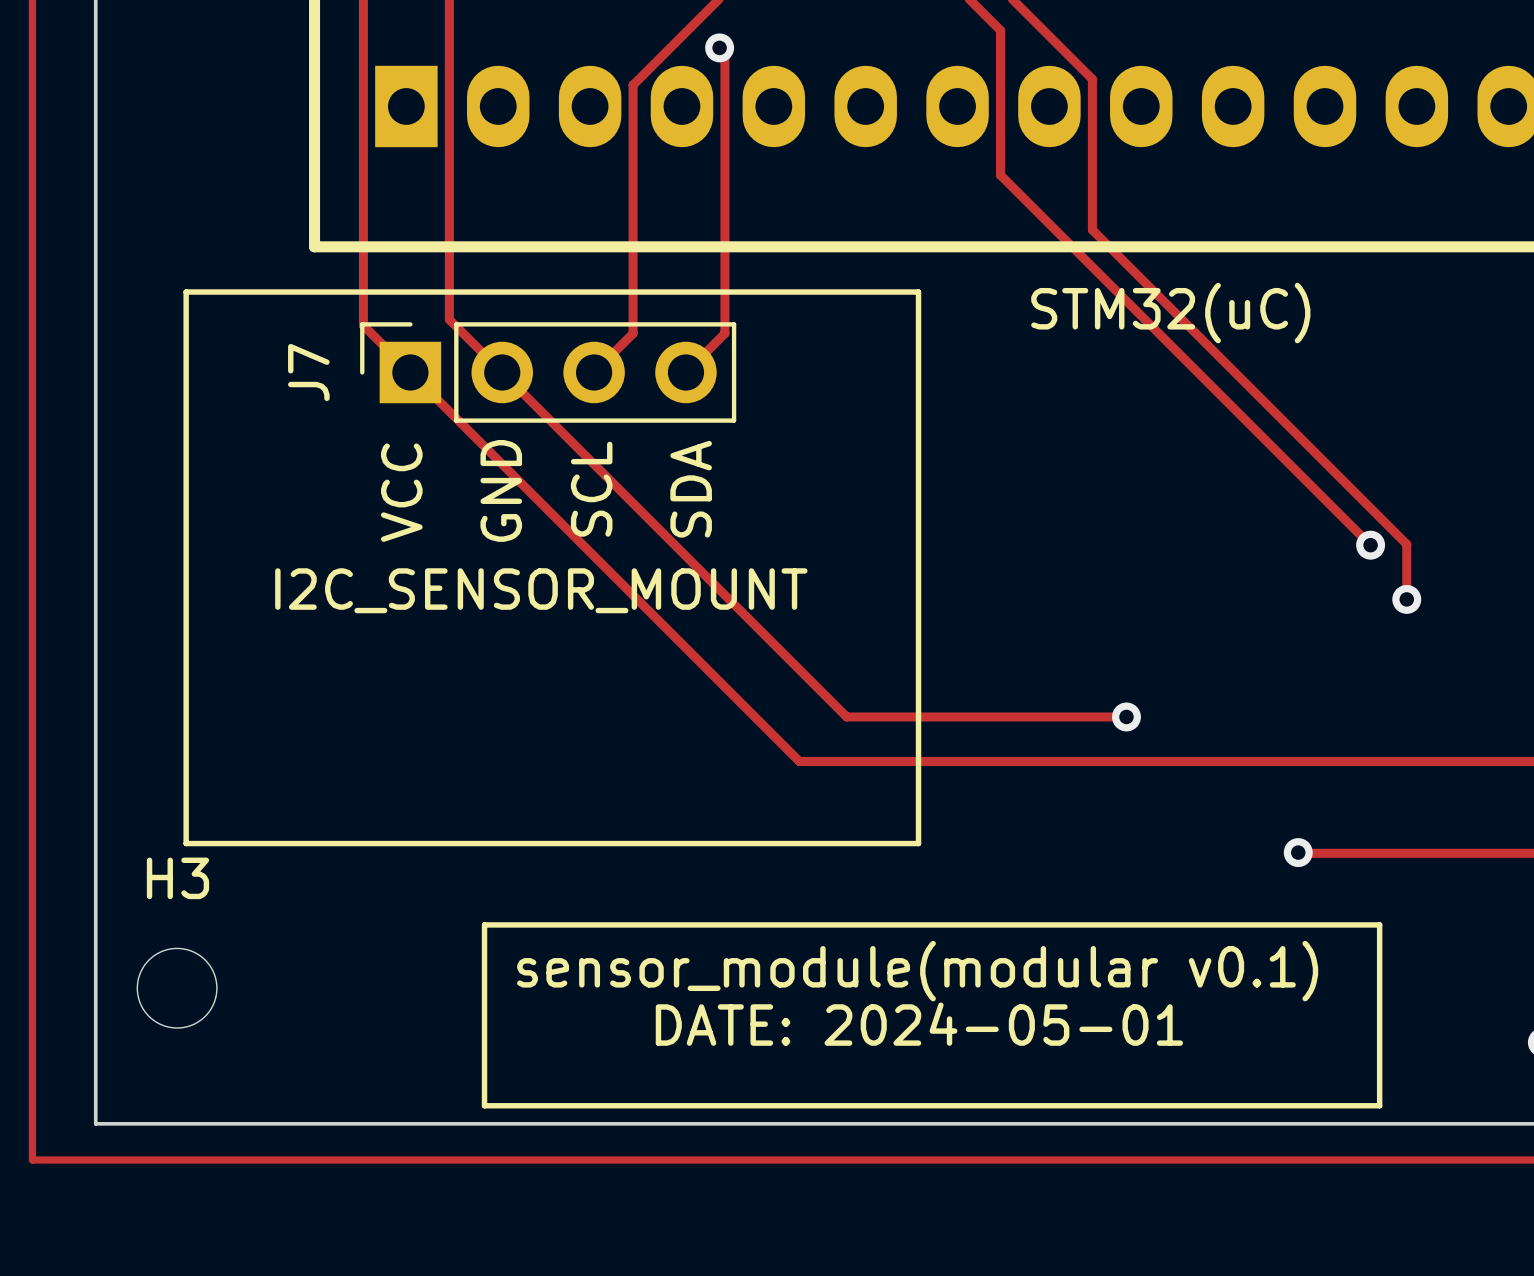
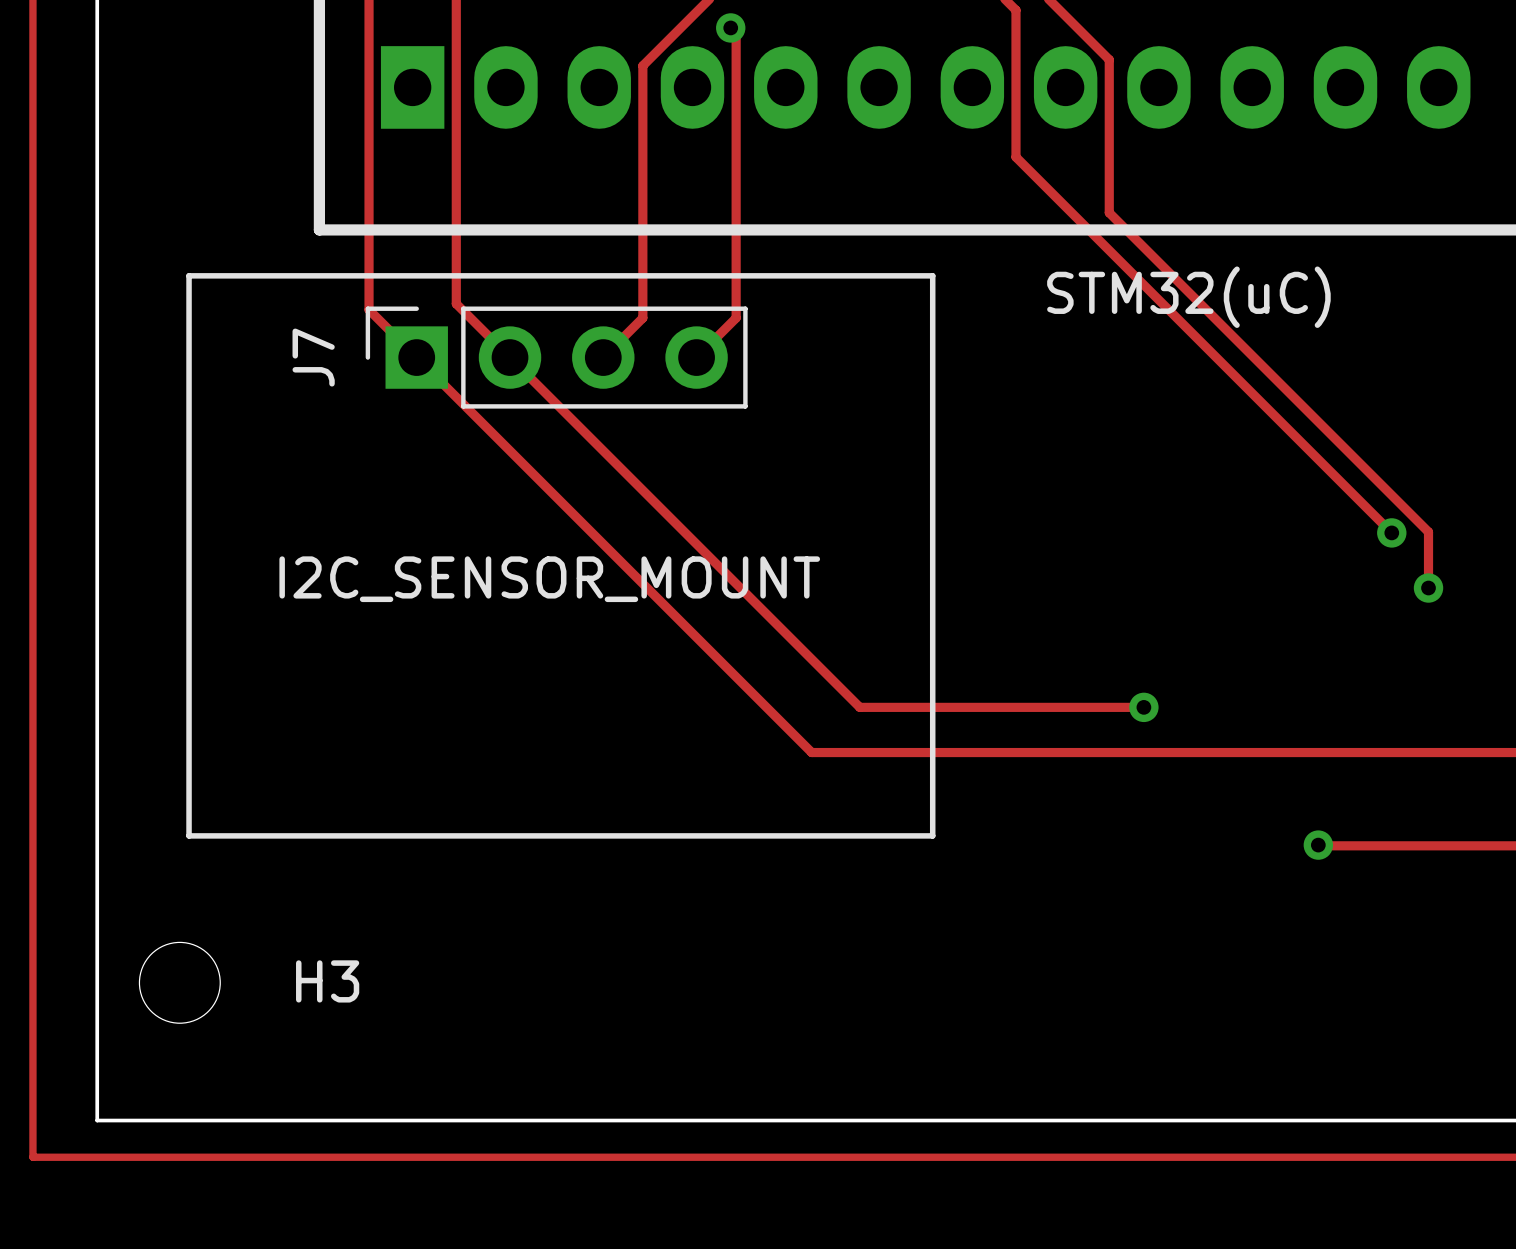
text: SCL (591, 489) -> none
text: SDA (691, 489) -> none
text: GND (501, 490) -> none
text: VCC (401, 492) -> none
H3 name position: H3 (177, 878) -> H3 (327, 981)
line: (484, 924) (1379, 924) (1379, 1105) (484, 1105) (484, 924) -> none
text: sensor_module(modular v0.1) (917, 971) -> none
text: DATE: 2024-05-01 (919, 1024) -> none

